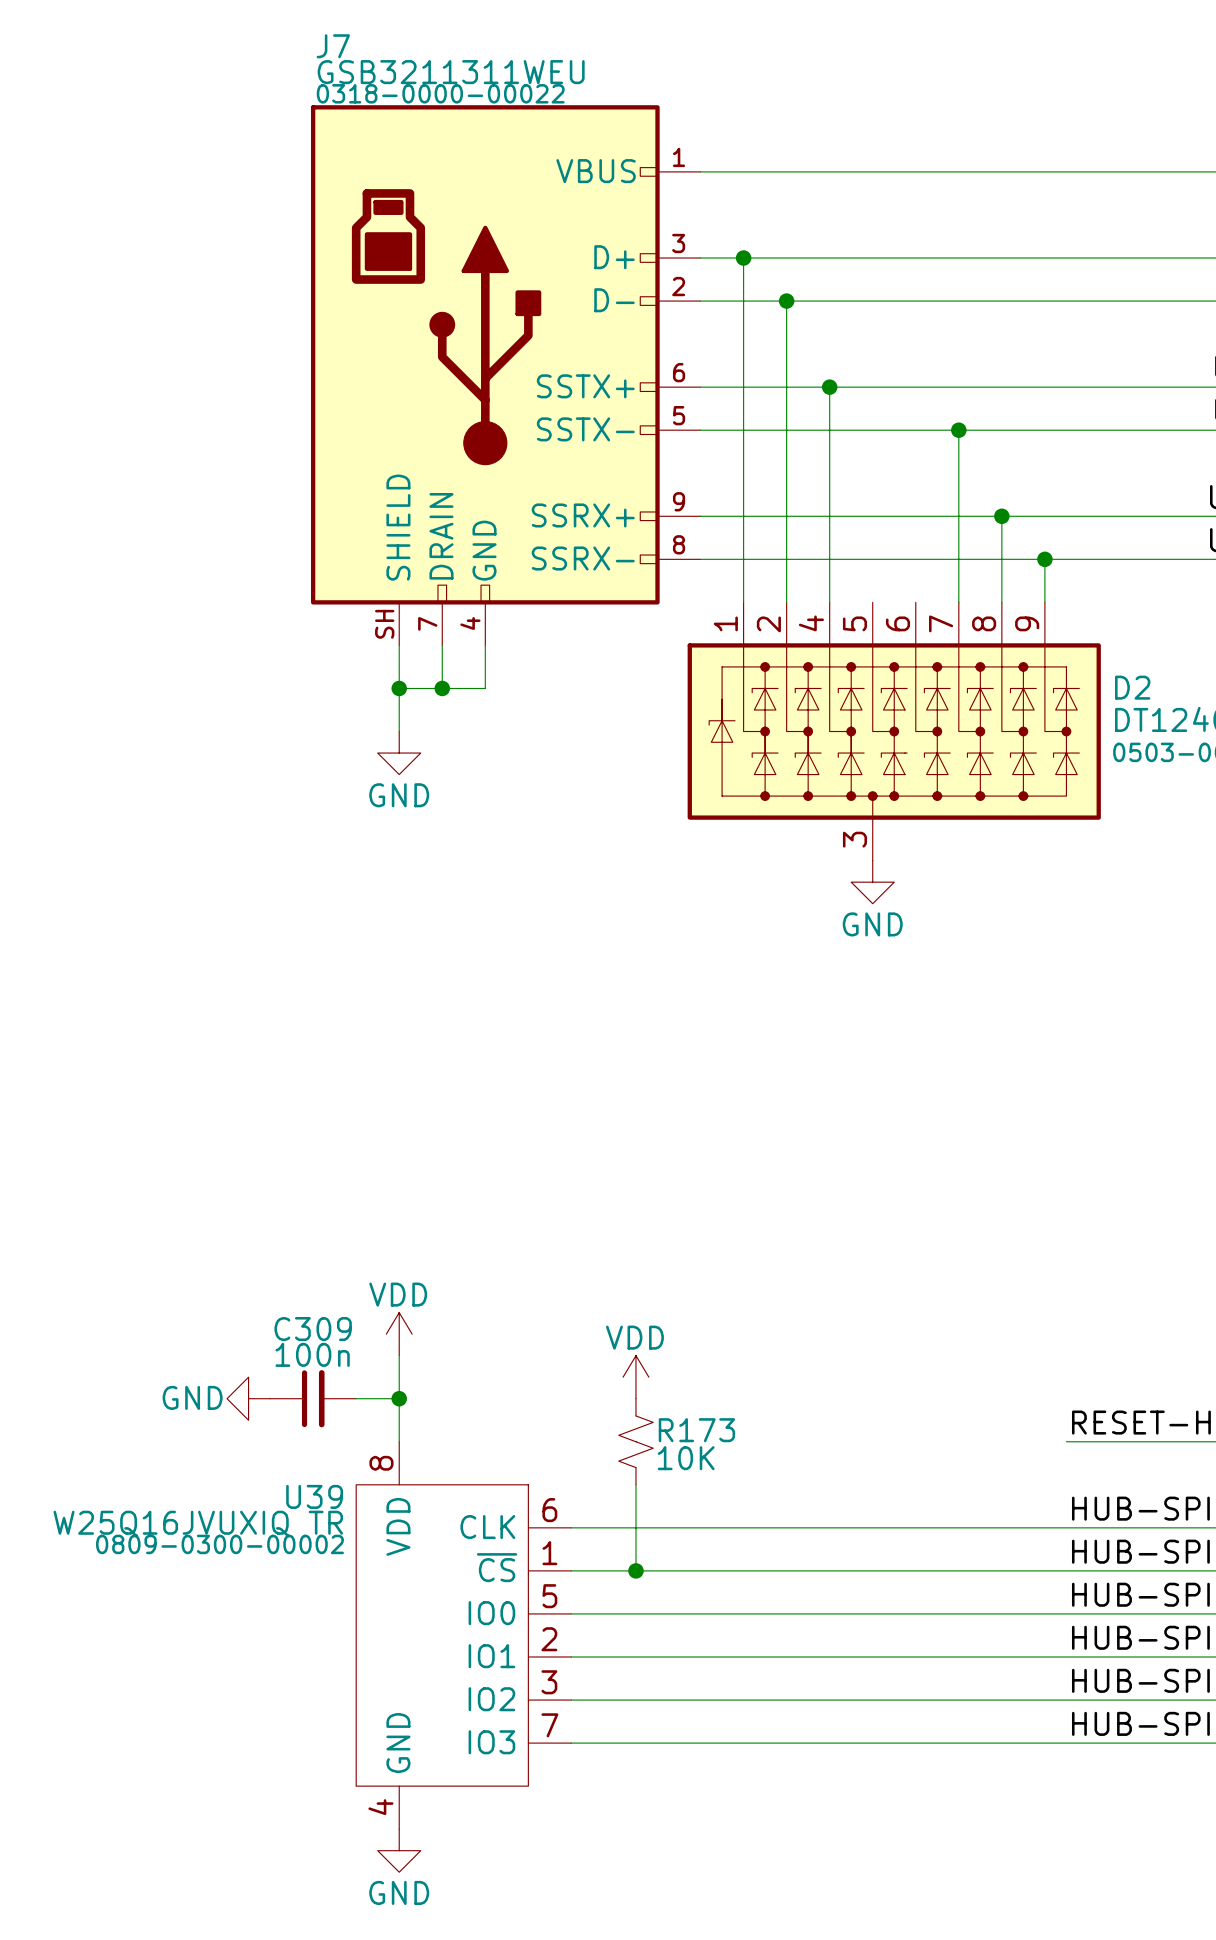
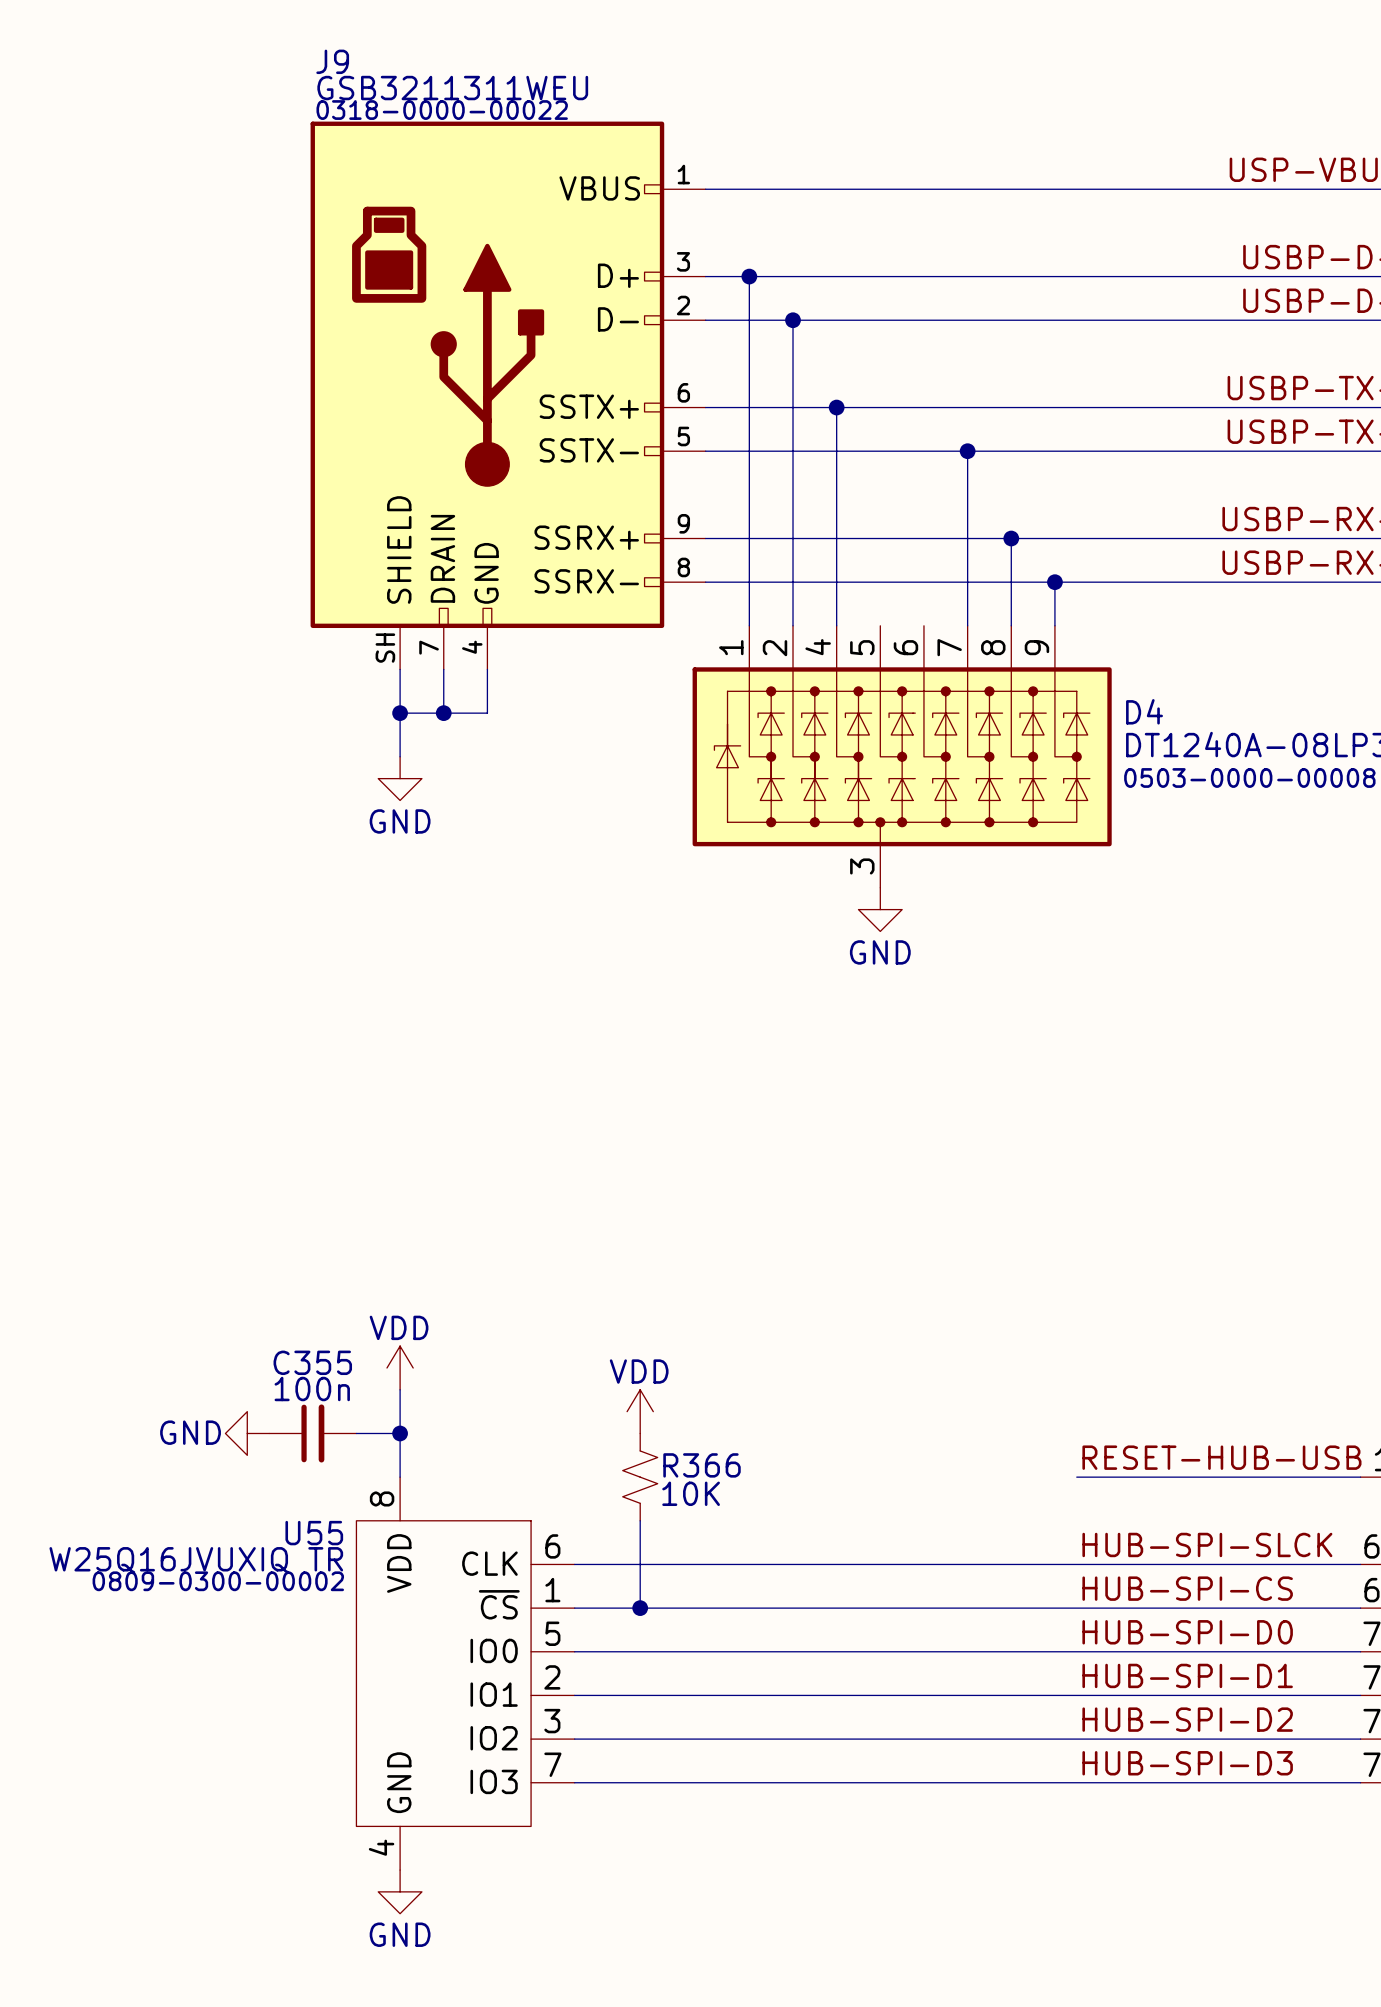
J7 name: J7 (333, 46) -> J9 (332, 61)
D2 name: D2 (1132, 687) -> D4 (1144, 711)
C309 name: C309 (313, 1329) -> C355 (312, 1362)
R173 name: R173 (696, 1430) -> R366 (702, 1465)
U39 name: U39 (314, 1496) -> U55 (314, 1533)

